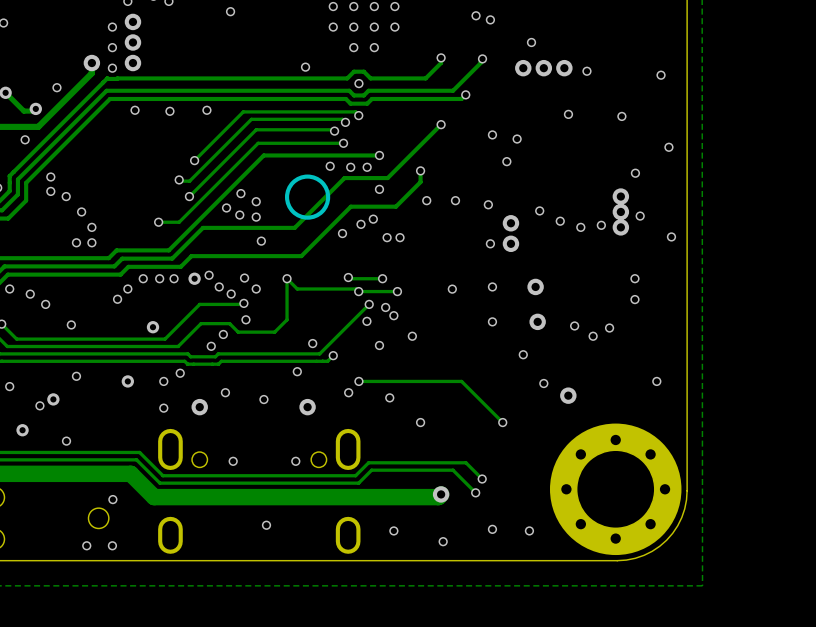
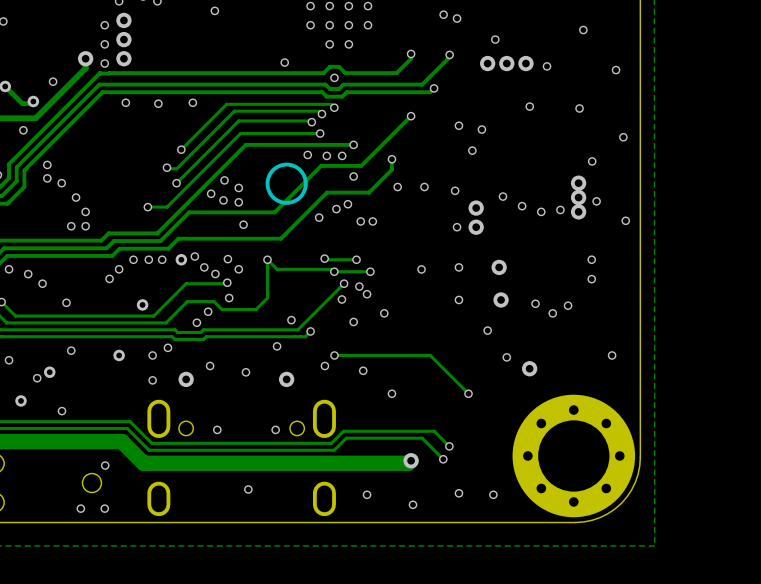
via: none -> (583, 30)

